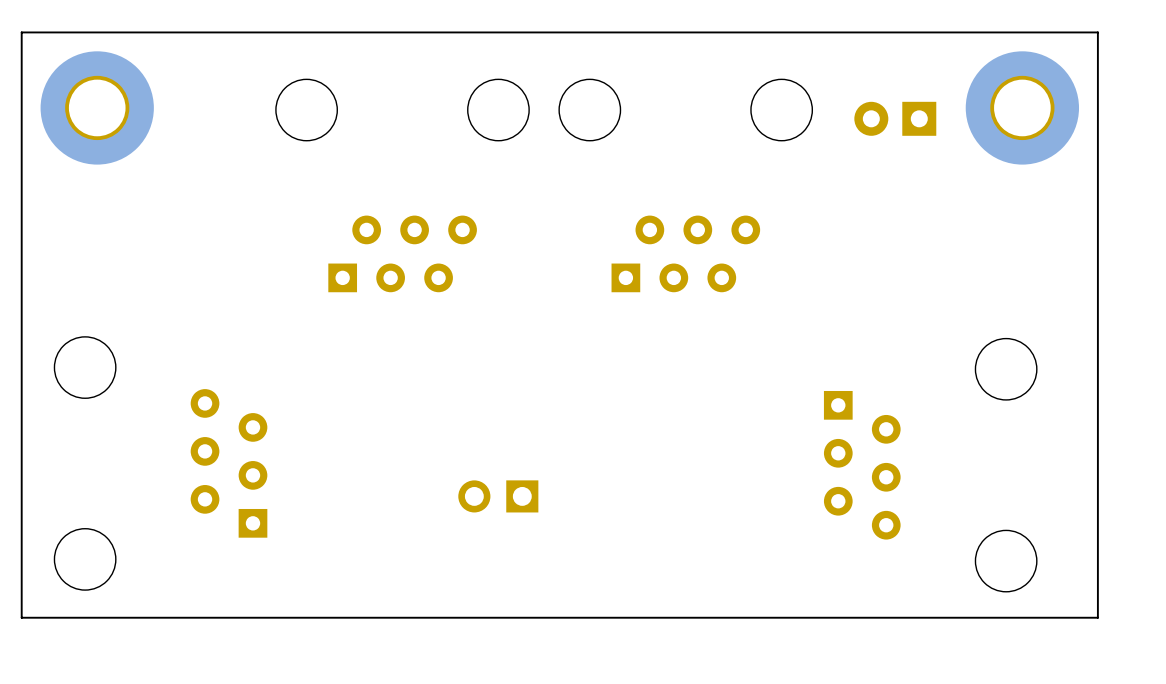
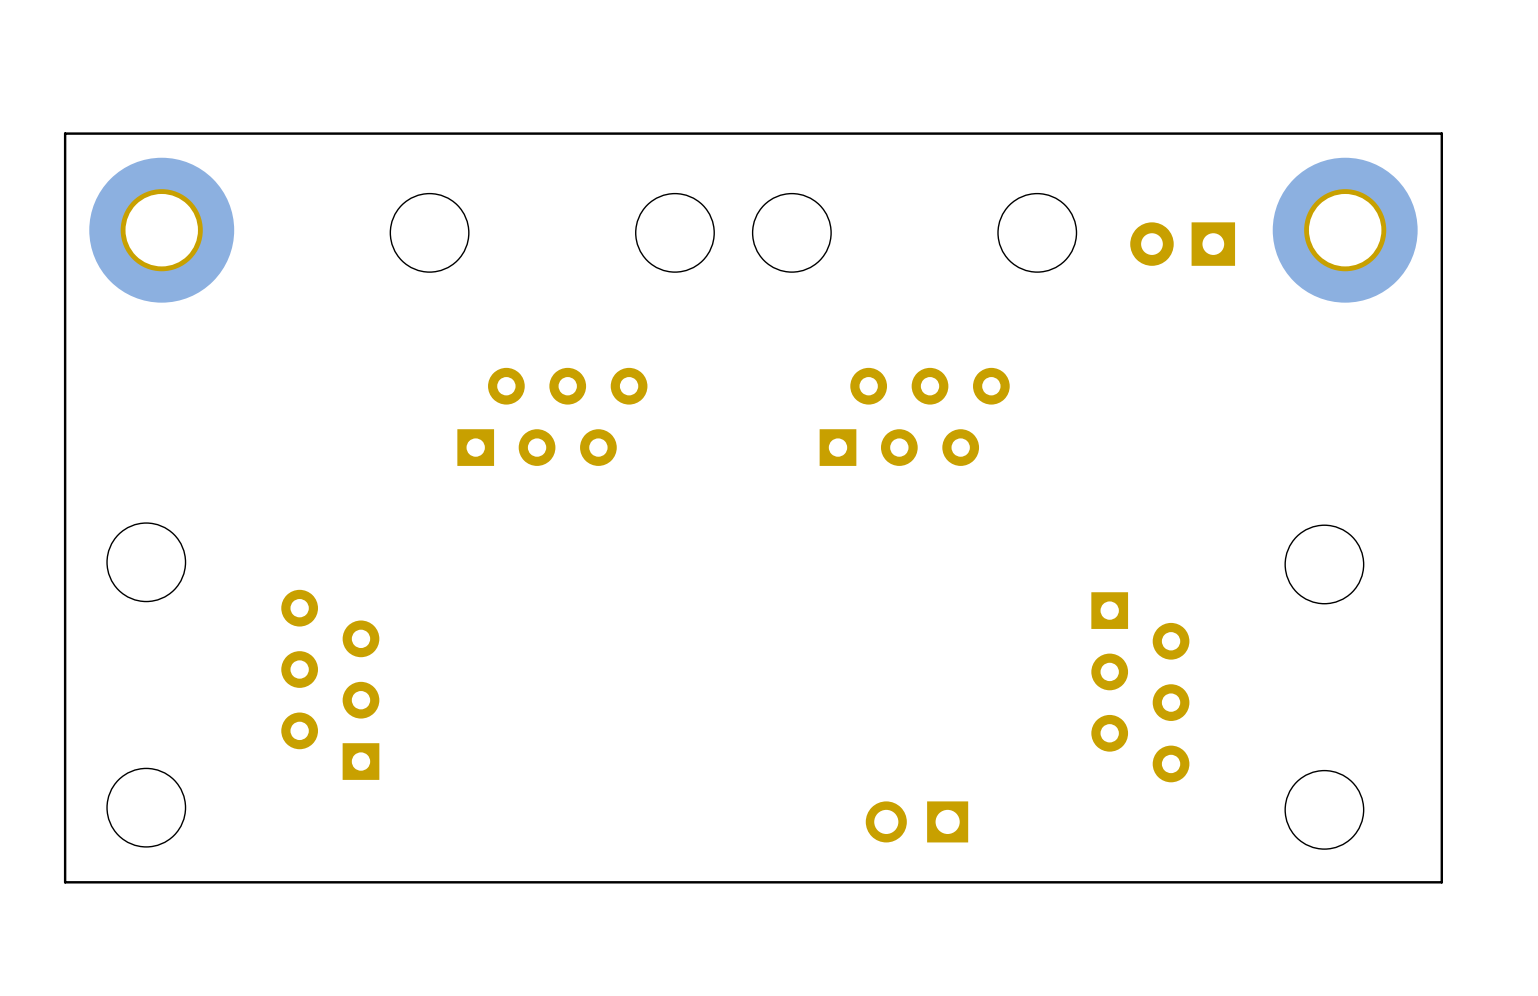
part position: (498, 496) -> (916, 821)

